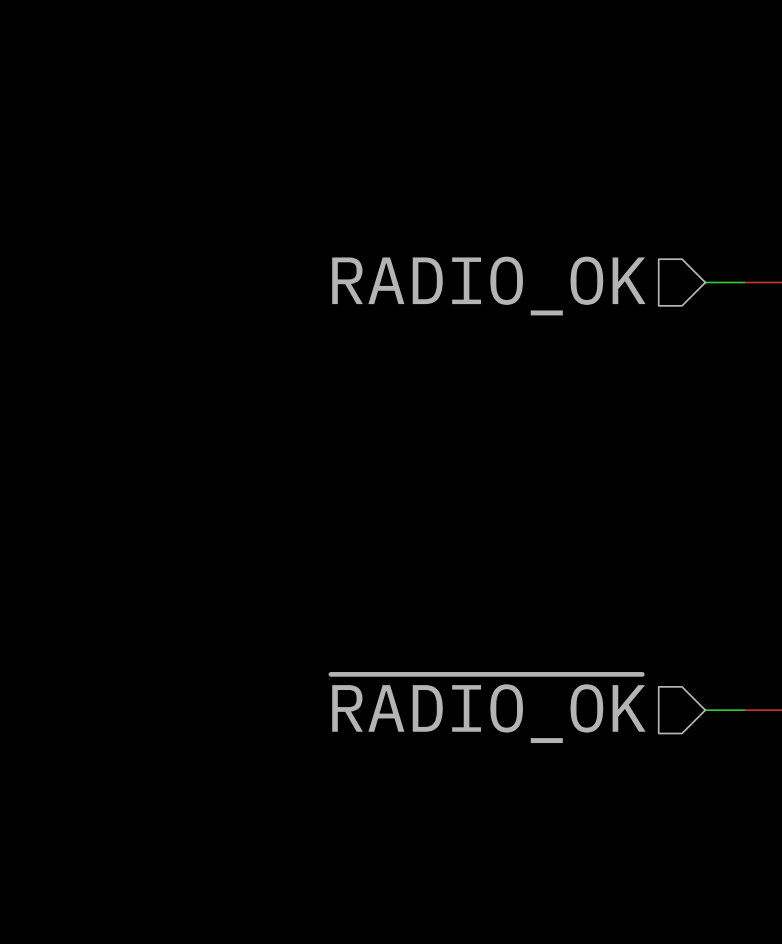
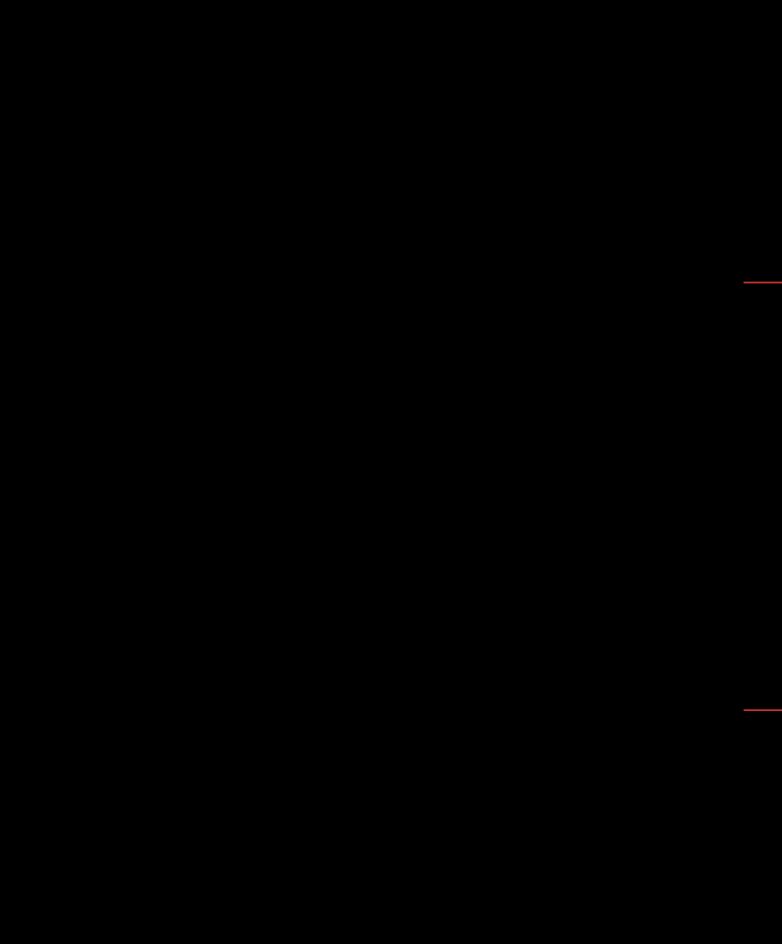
wire: (705, 282) (744, 282) -> none
hierarchical label: RADIO_OK (488, 286) -> none
hierarchical label: ~{RADIO_OK} (488, 708) -> none
wire: (705, 710) (744, 710) -> none

